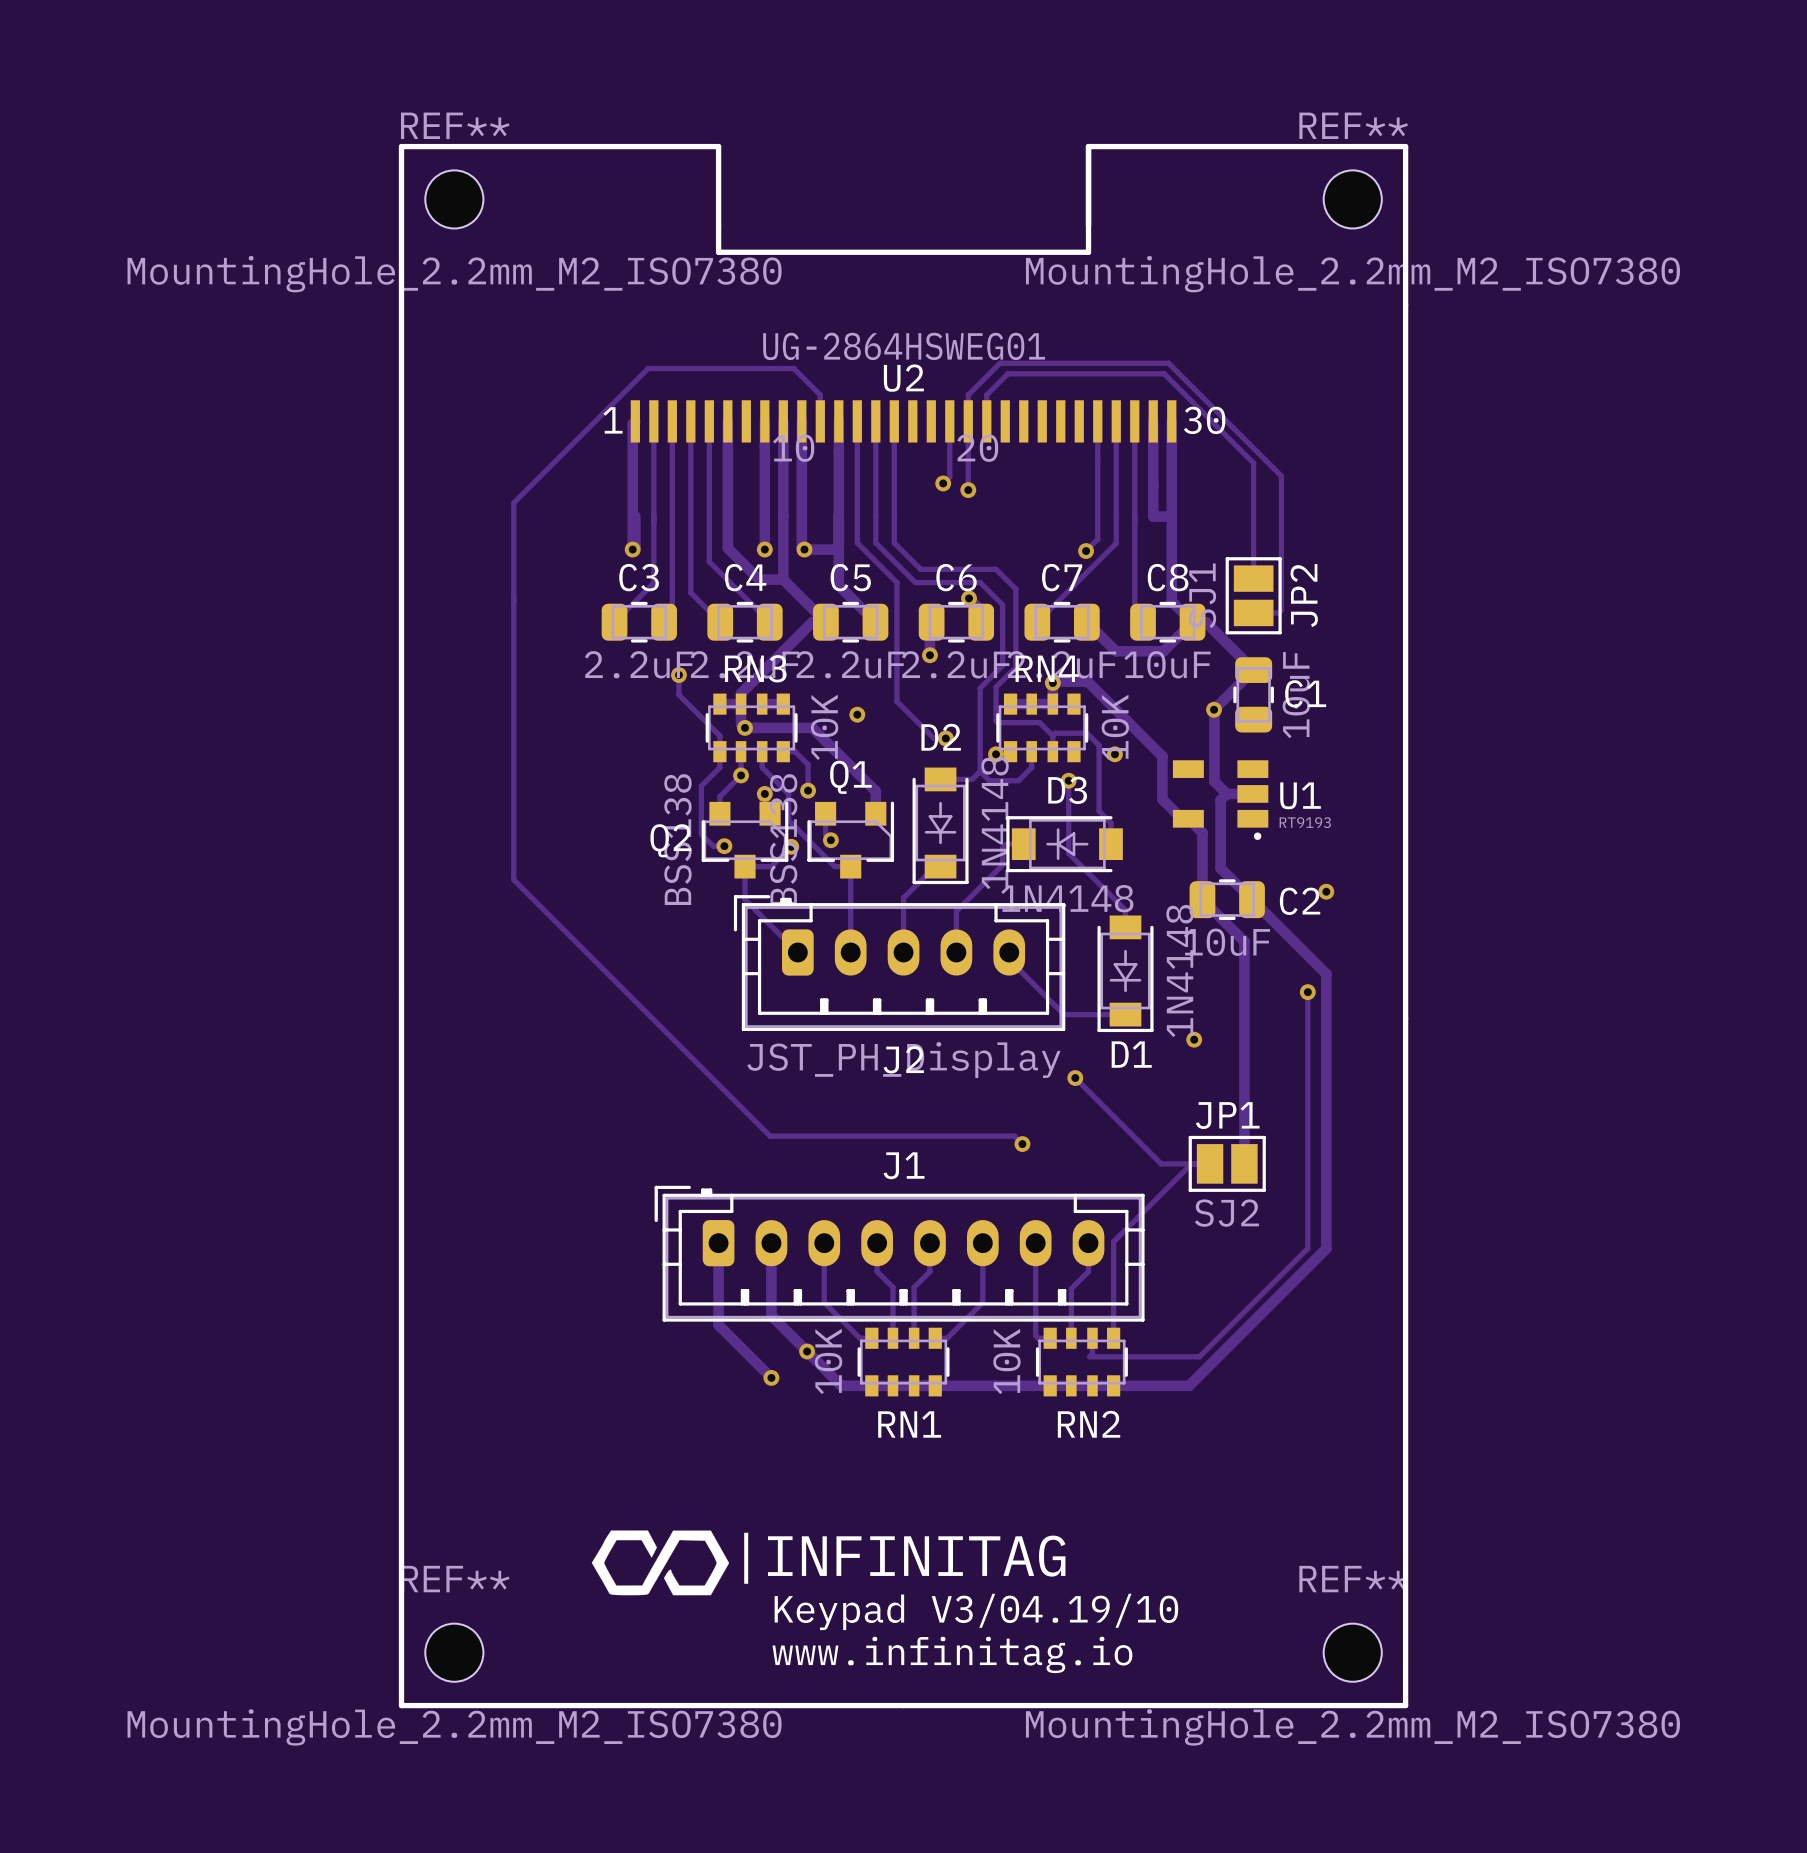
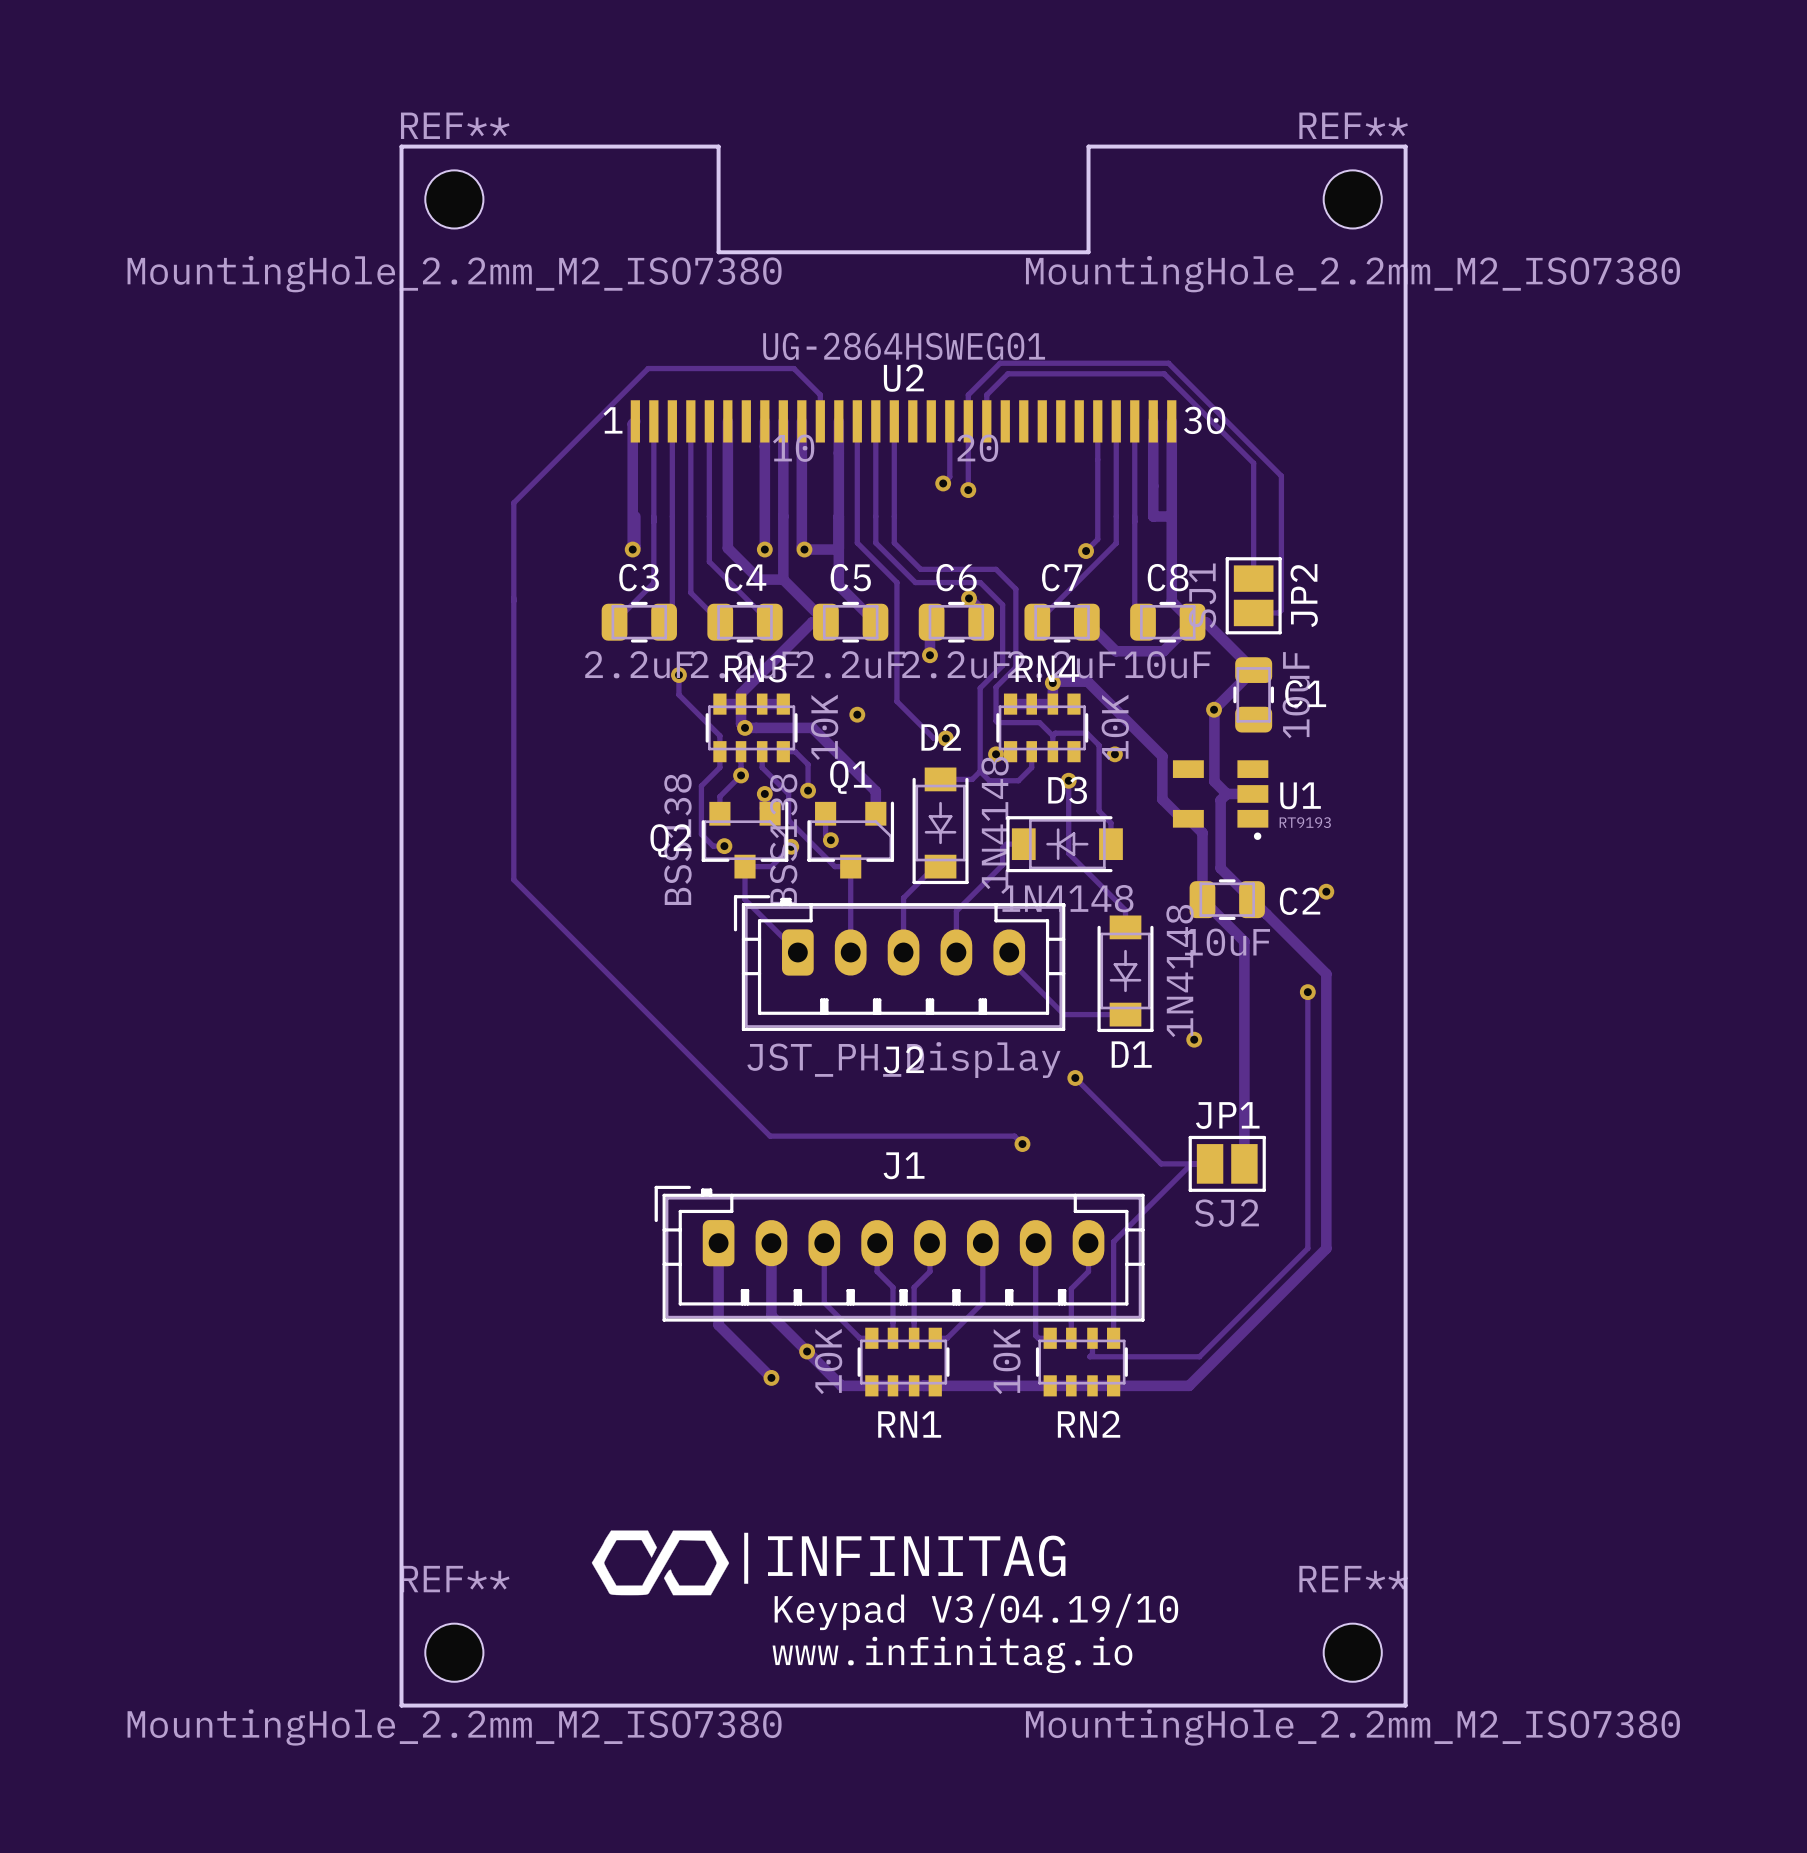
line: (401, 146) (401, 1705) (1405, 1705) (1405, 146) (1088, 146) (1088, 252) (718, 252) (718, 146) (401, 146) -> none
board edge: none -> (401, 146) (718, 146) (718, 252) (1088, 252) (1088, 146) (1405, 146) (1405, 1705) (401, 1705) (401, 146)

